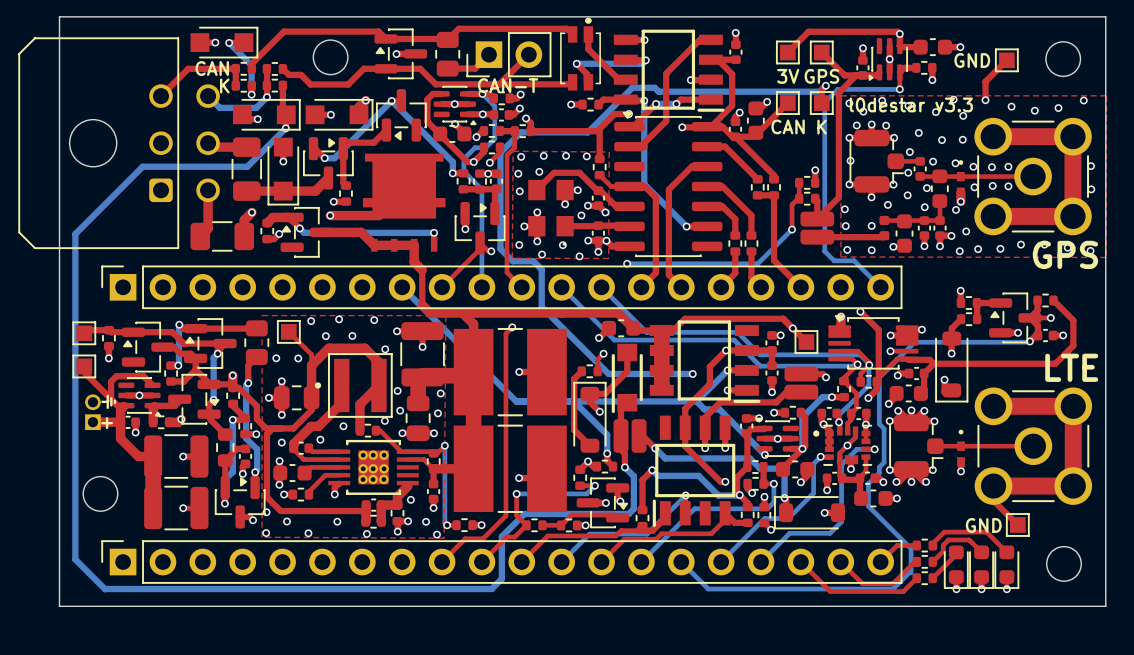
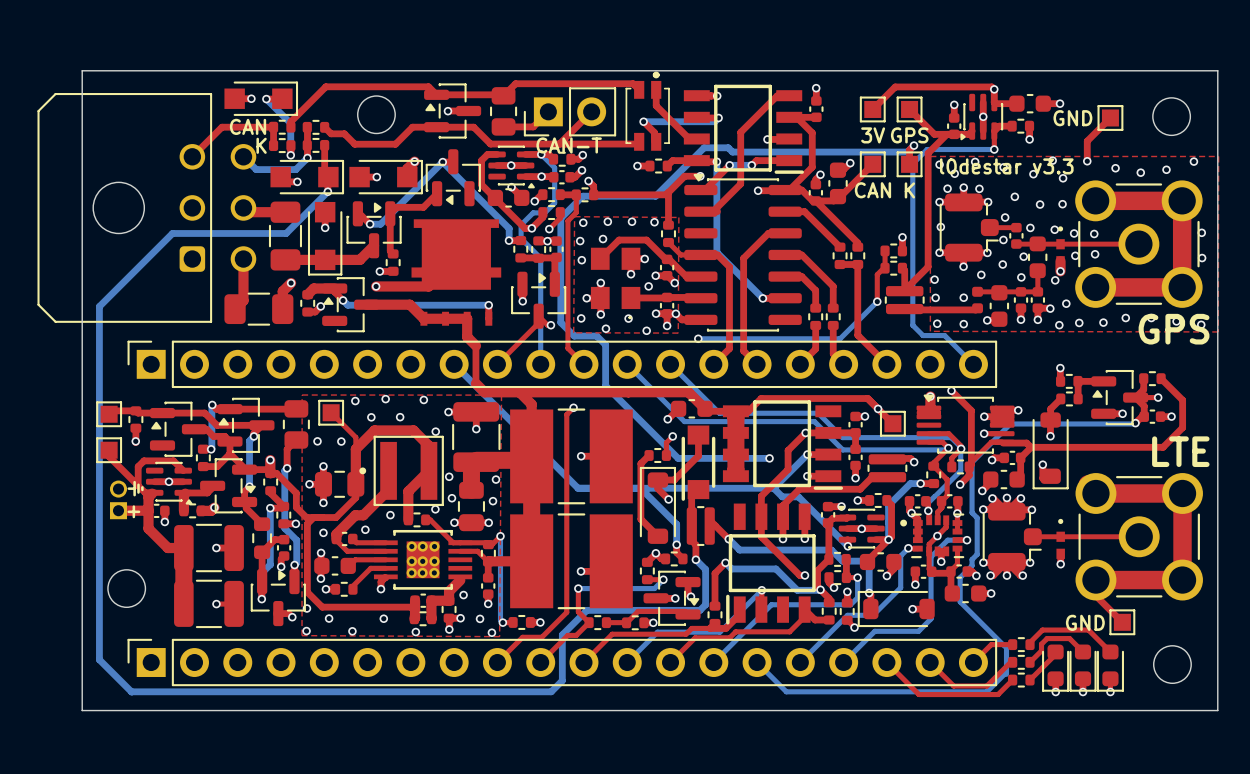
via: (1008, 166) -> none
via: (1008, 186) -> none
part footprint: [800, 211, 835, 245] -> [884, 286, 925, 315]
part footprint: [784, 366, 819, 400] -> [867, 454, 908, 483]
part footprint: [613, 419, 647, 453] -> [686, 506, 715, 546]

